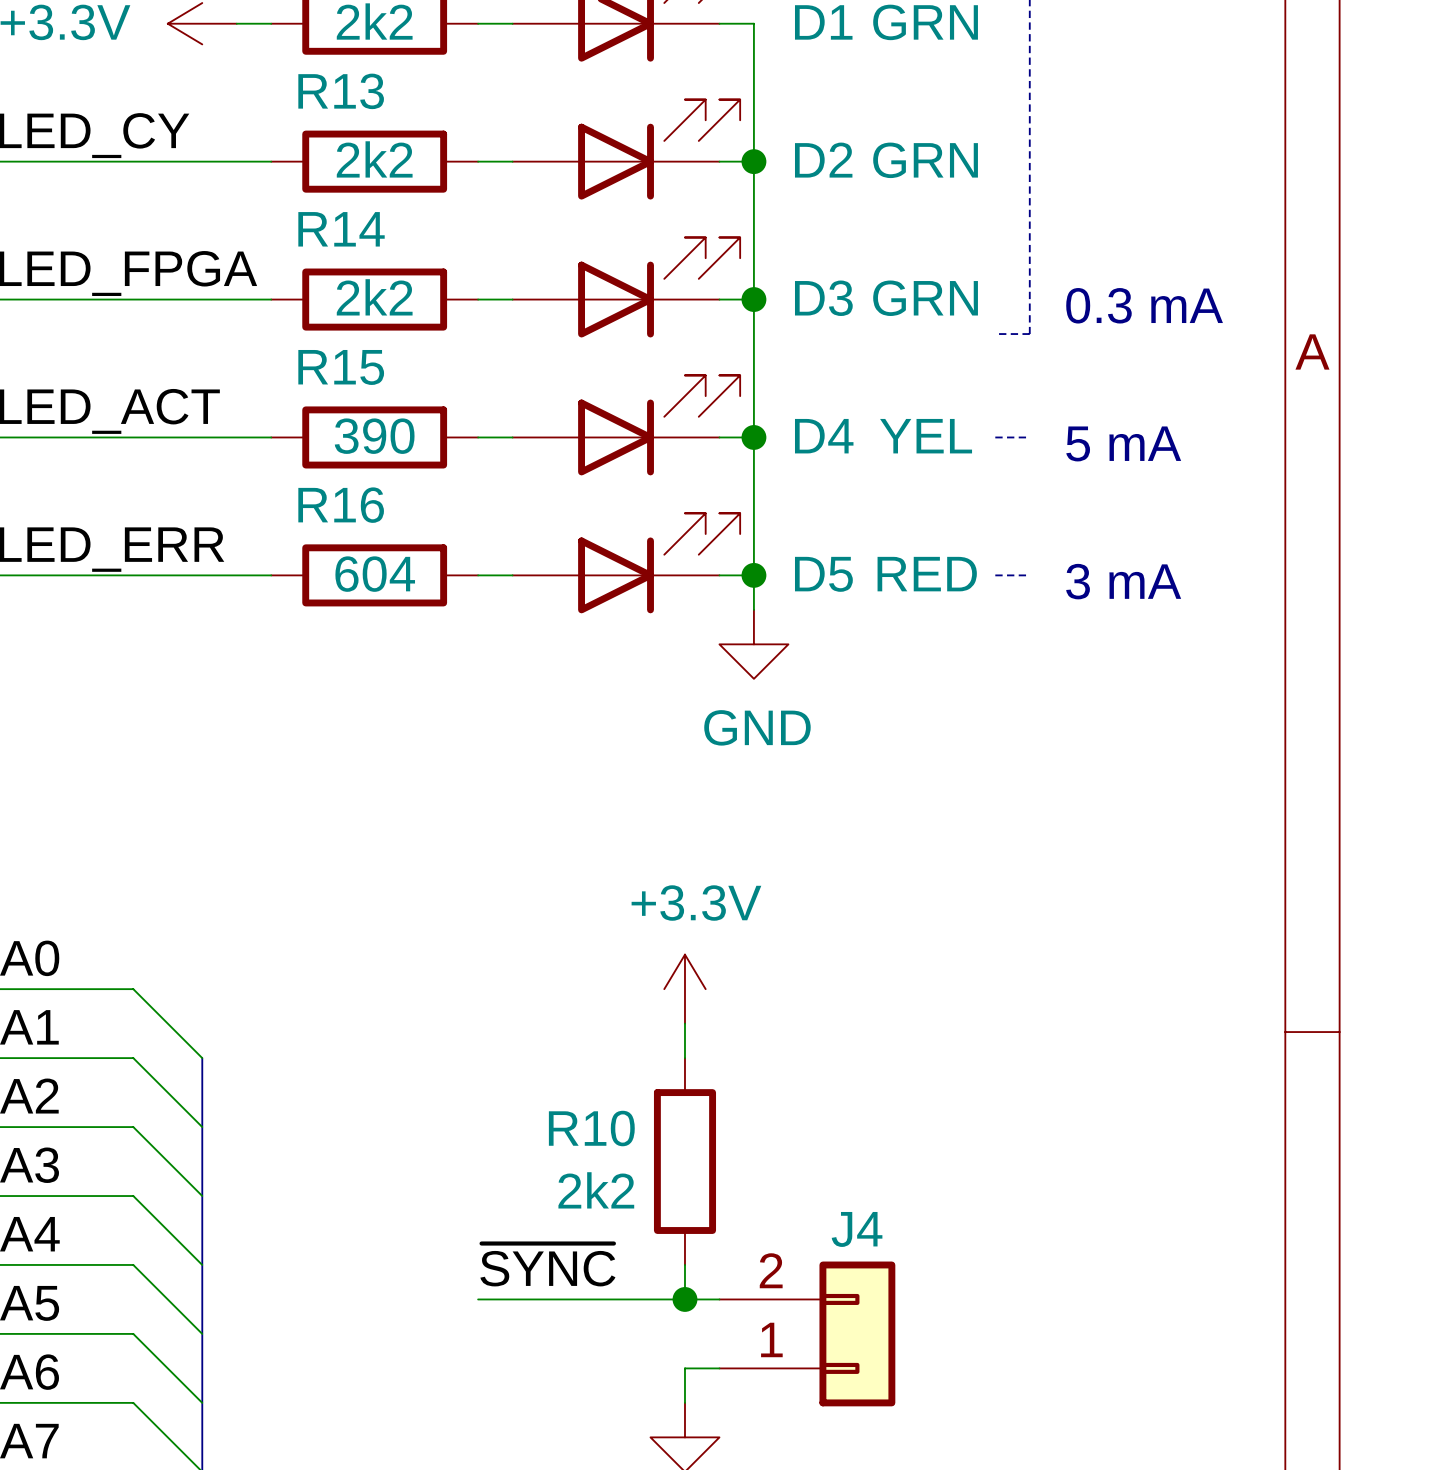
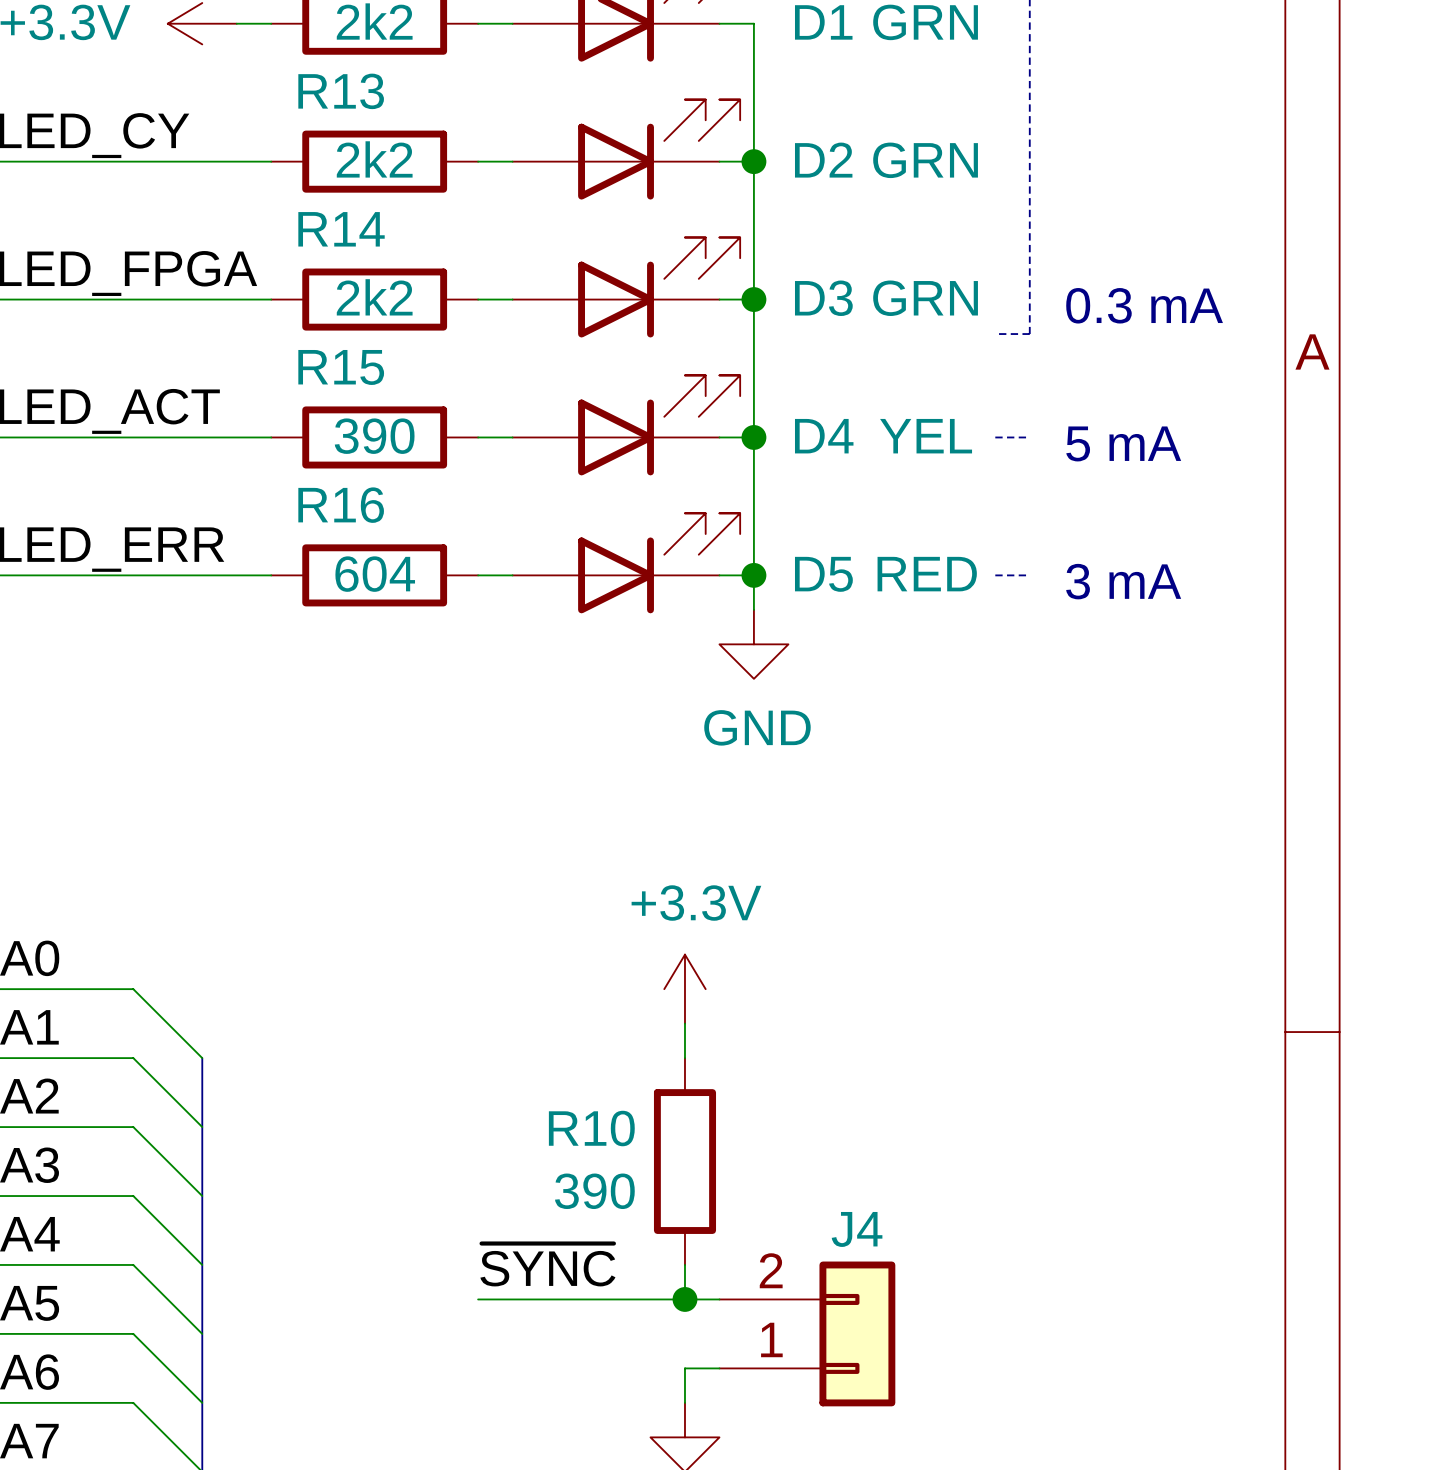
R10 value: 2k2 (596, 1190) -> 390 (594, 1191)

